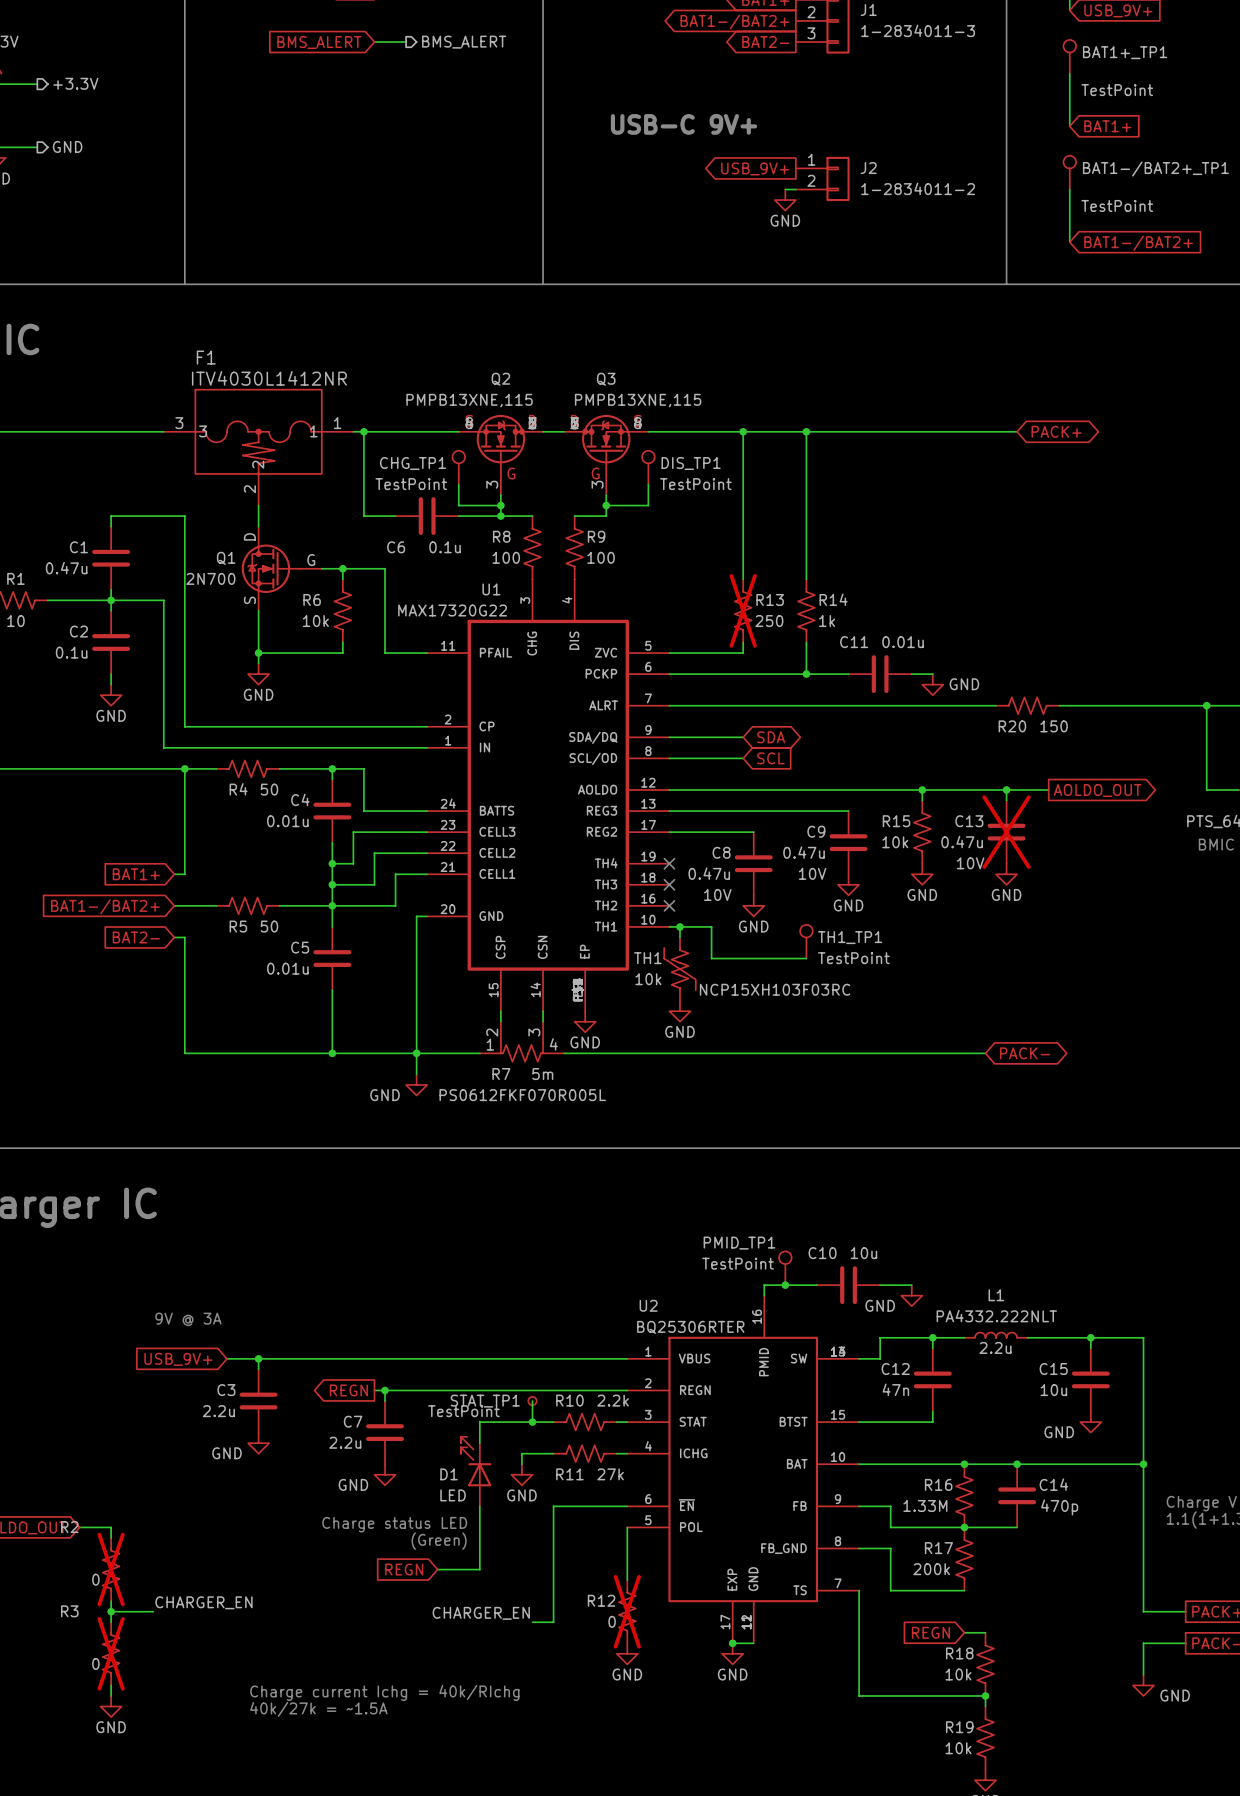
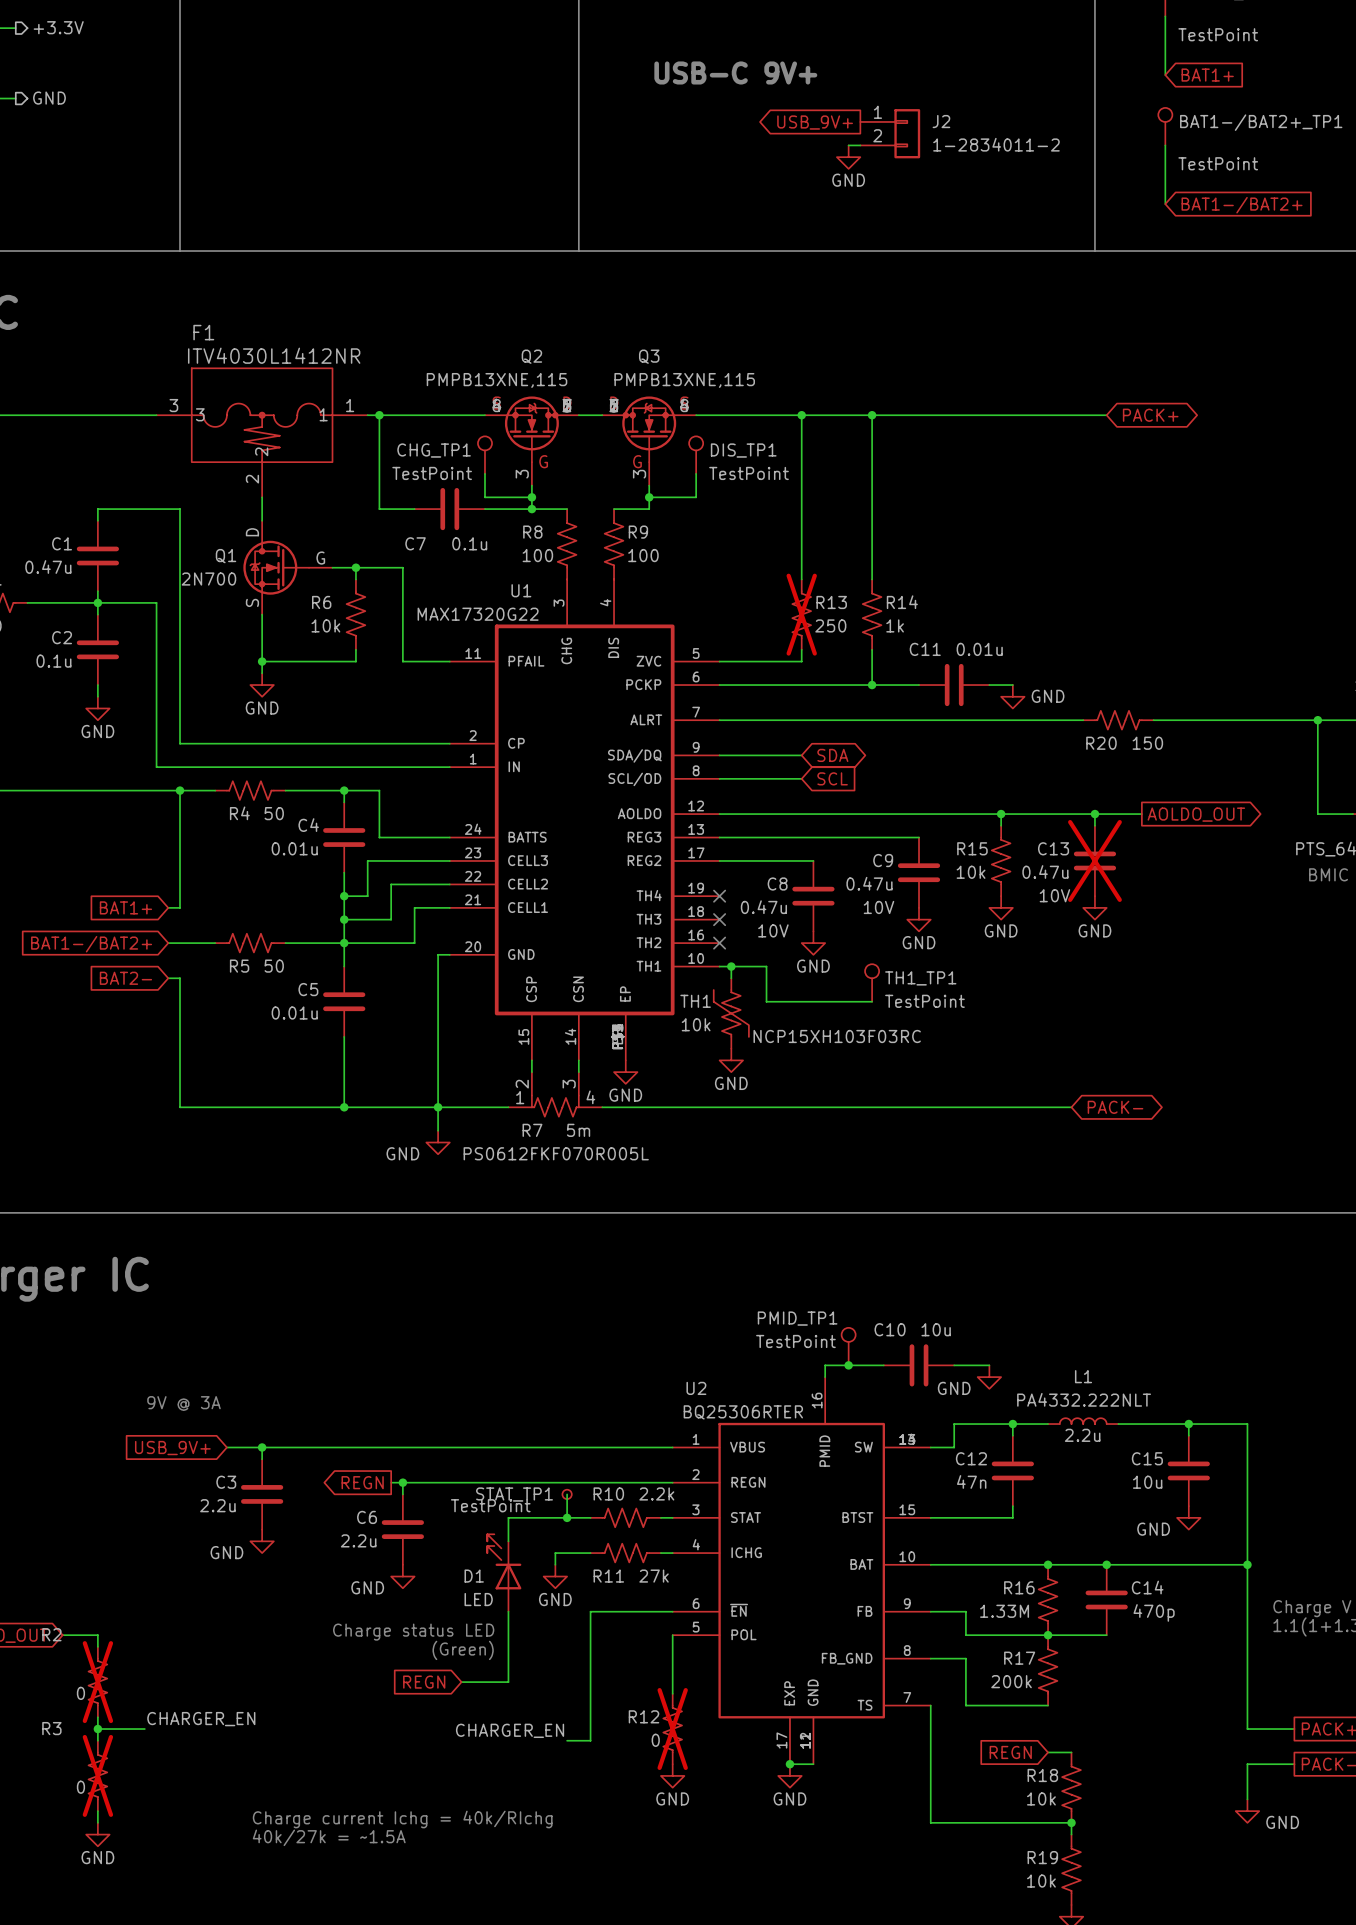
C6 name: C6 (396, 547) -> C7 (415, 543)
C7 name: C7 (353, 1421) -> C6 (367, 1517)

